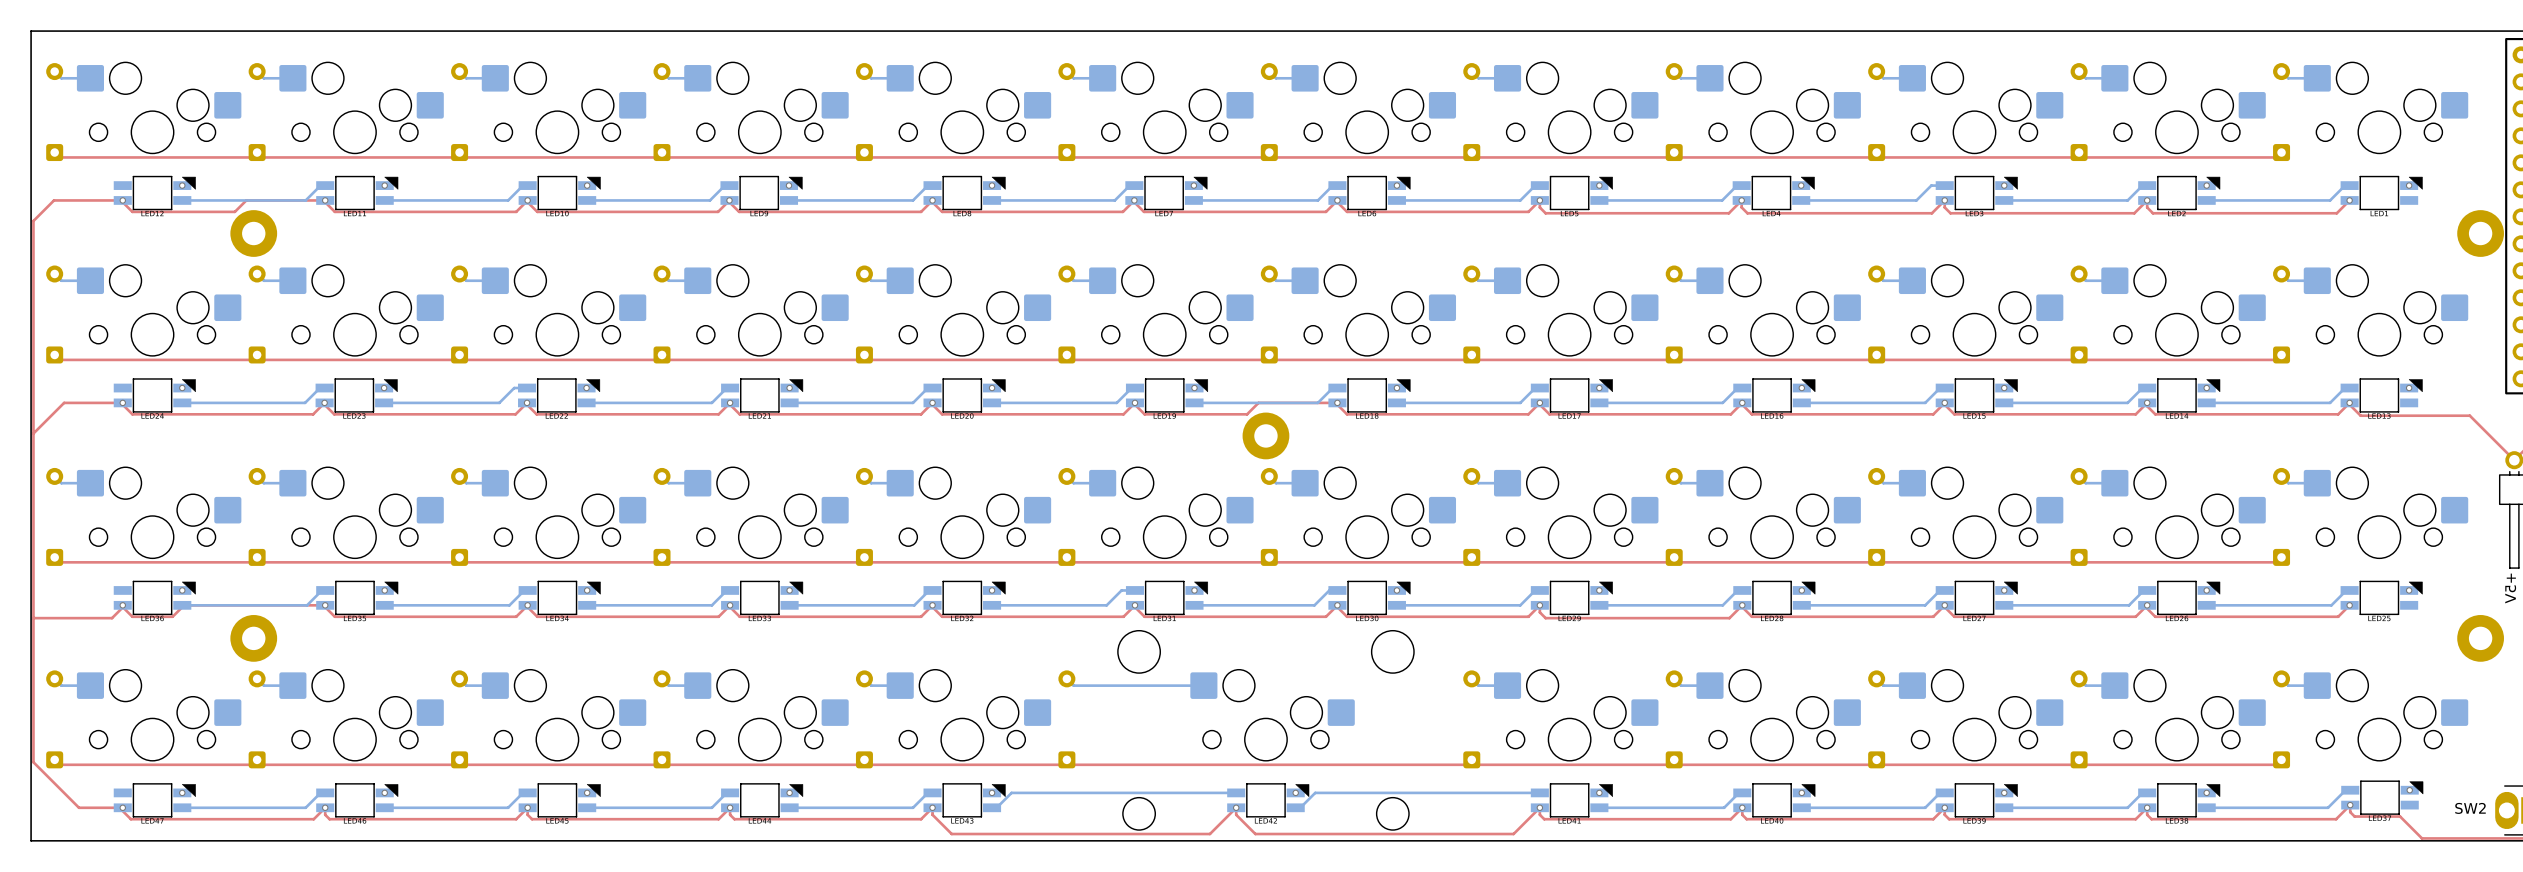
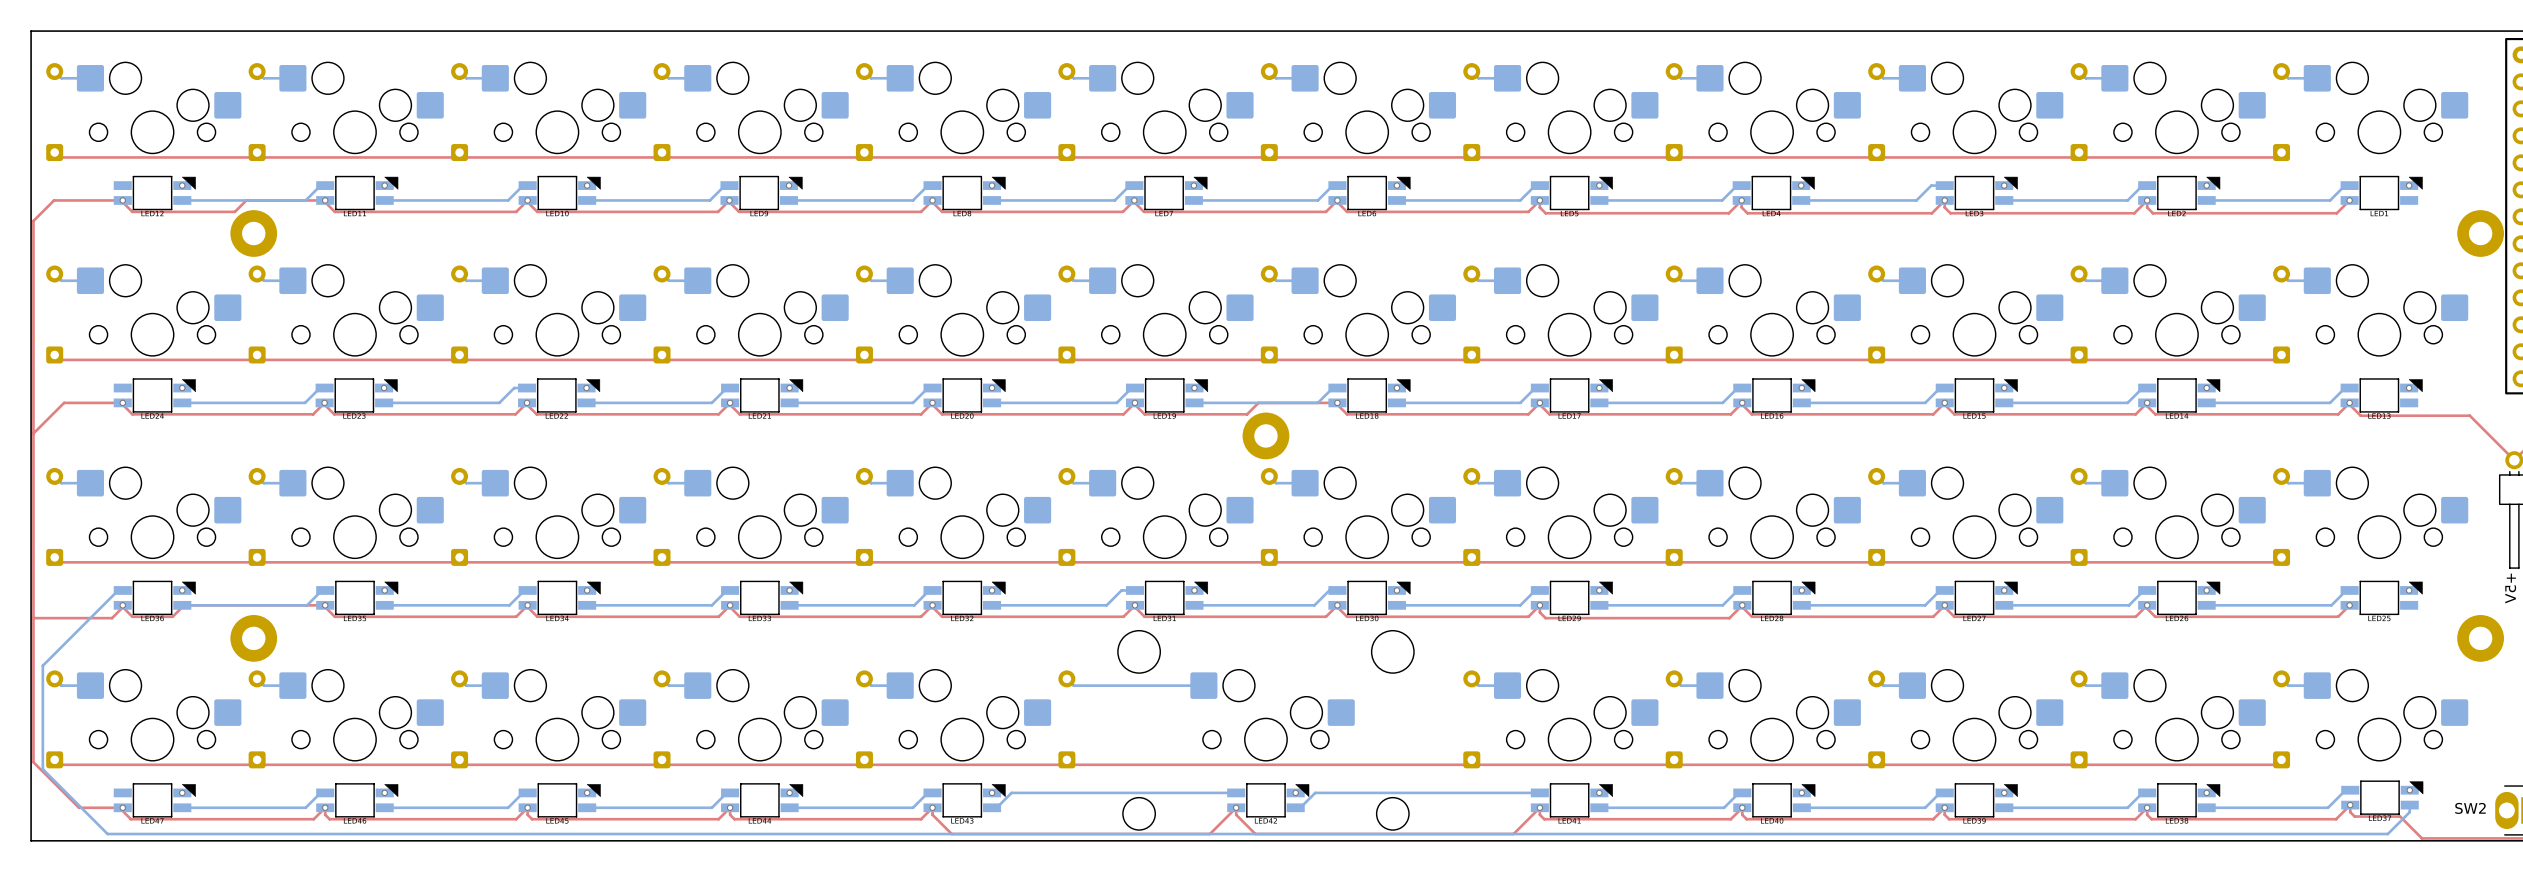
bottom track: none -> (122, 590) (118, 590) (42, 665) (42, 769) (107, 834) (2387, 834) (2409, 812) (2409, 805)

